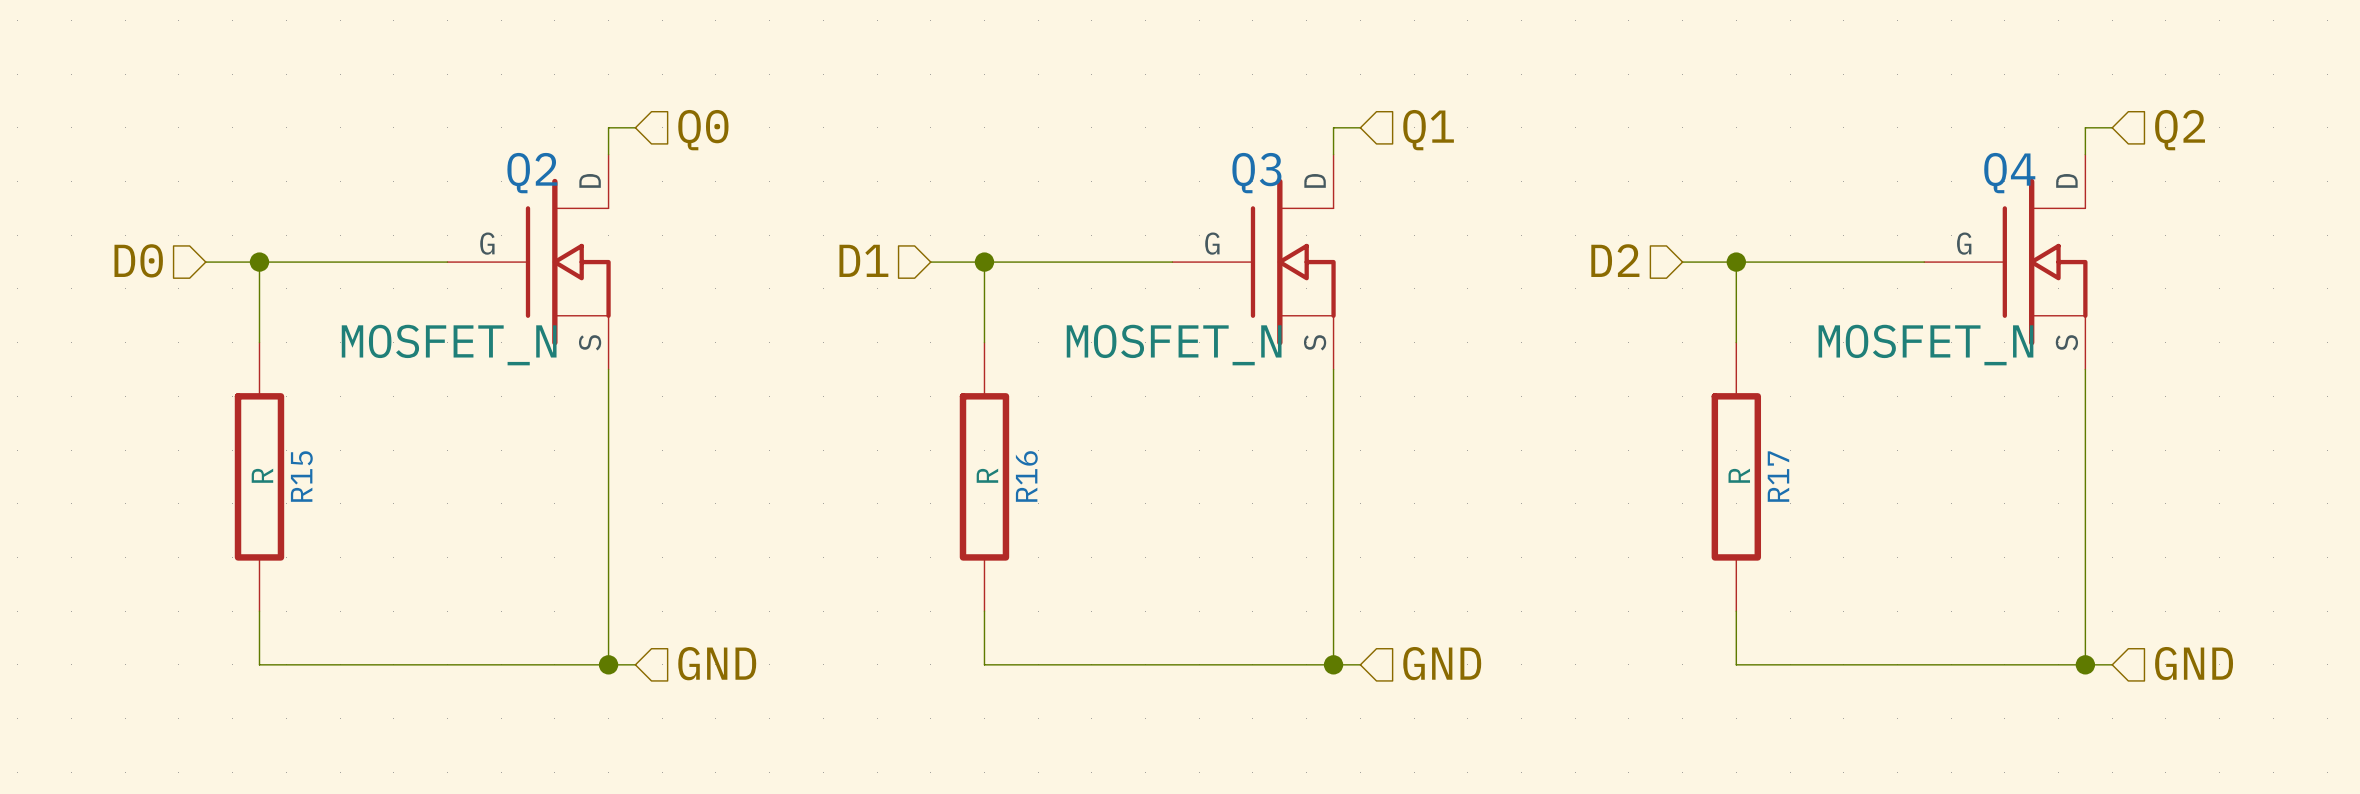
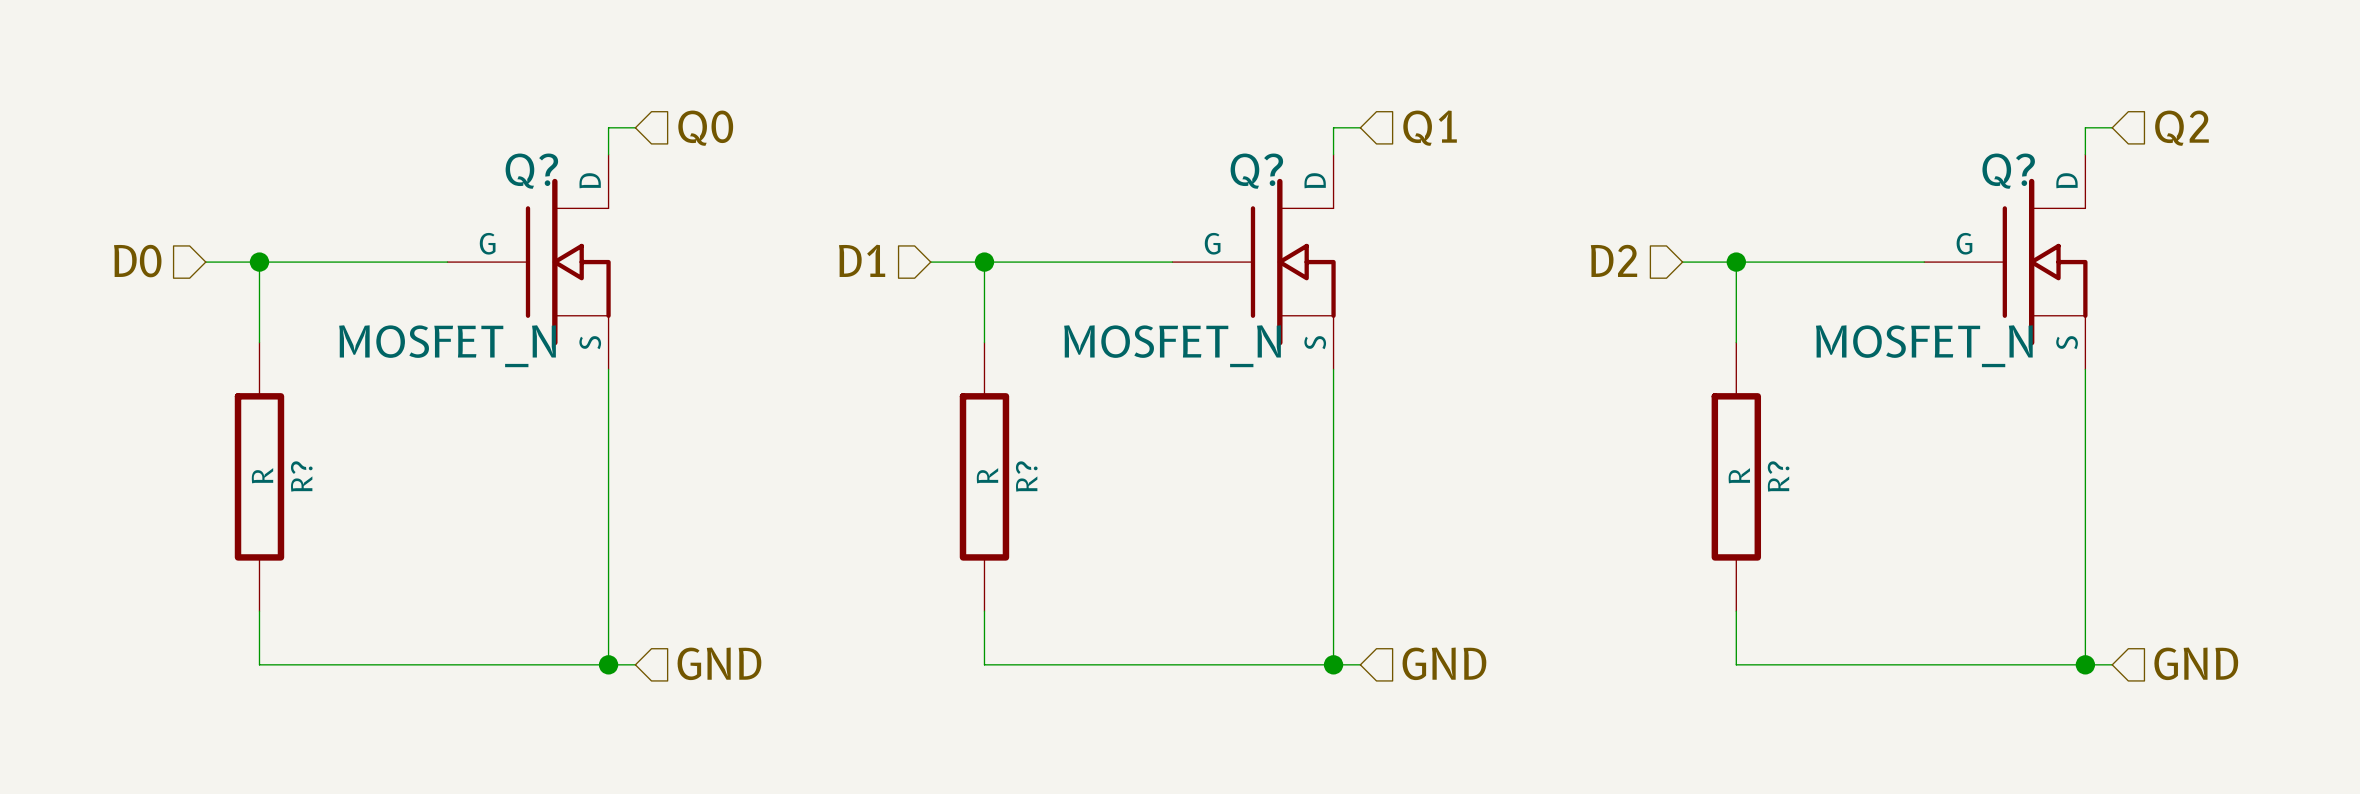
Q2 name: Q2 (532, 173) -> Q? (531, 171)
Q3 name: Q3 (1256, 173) -> Q? (1256, 171)
Q4 name: Q4 (2009, 173) -> Q? (2008, 171)
R15 name: R15 (301, 476) -> R? (301, 476)
R16 name: R16 (1026, 476) -> R? (1026, 476)
R17 name: R17 (1778, 476) -> R? (1778, 476)

